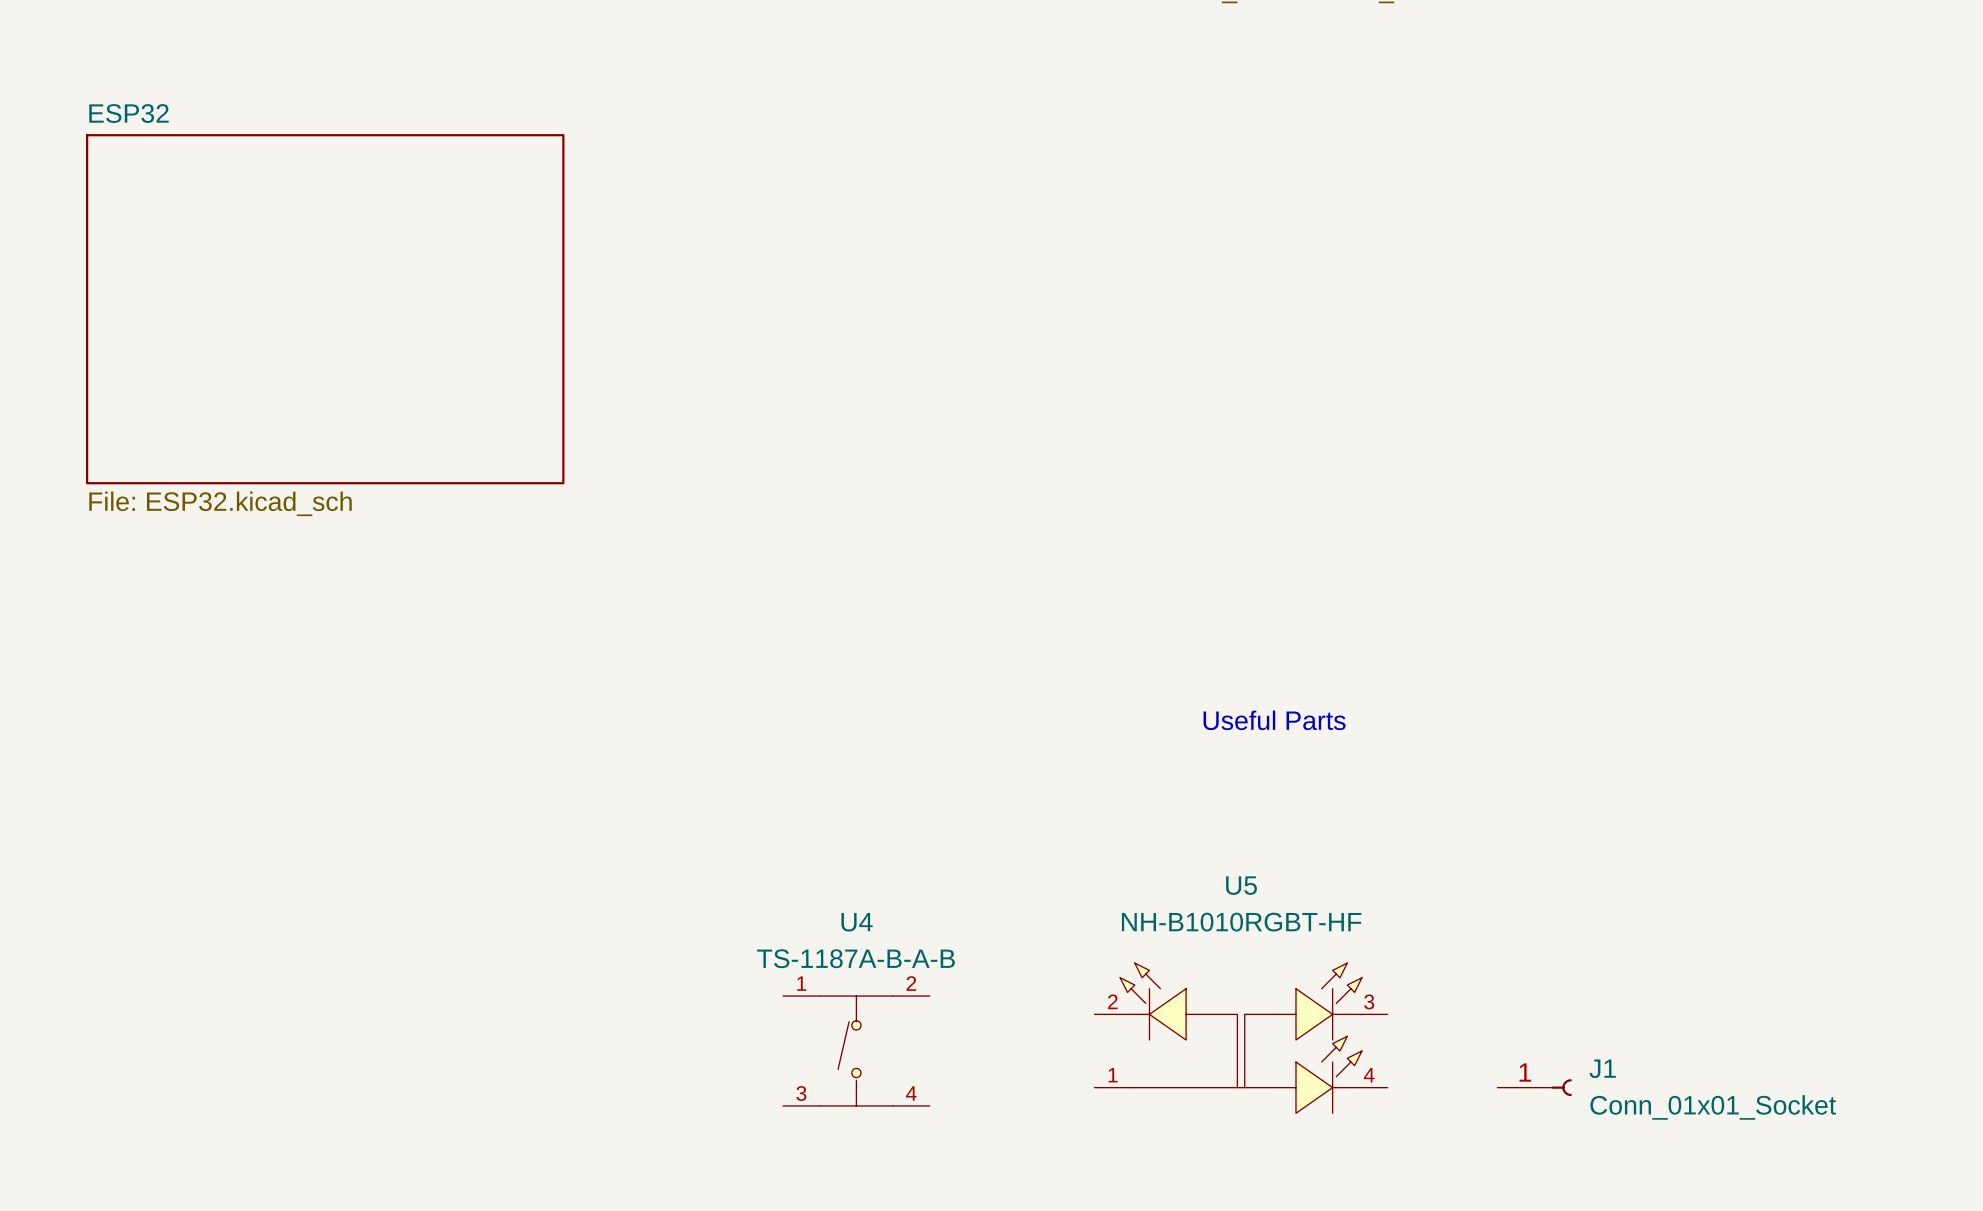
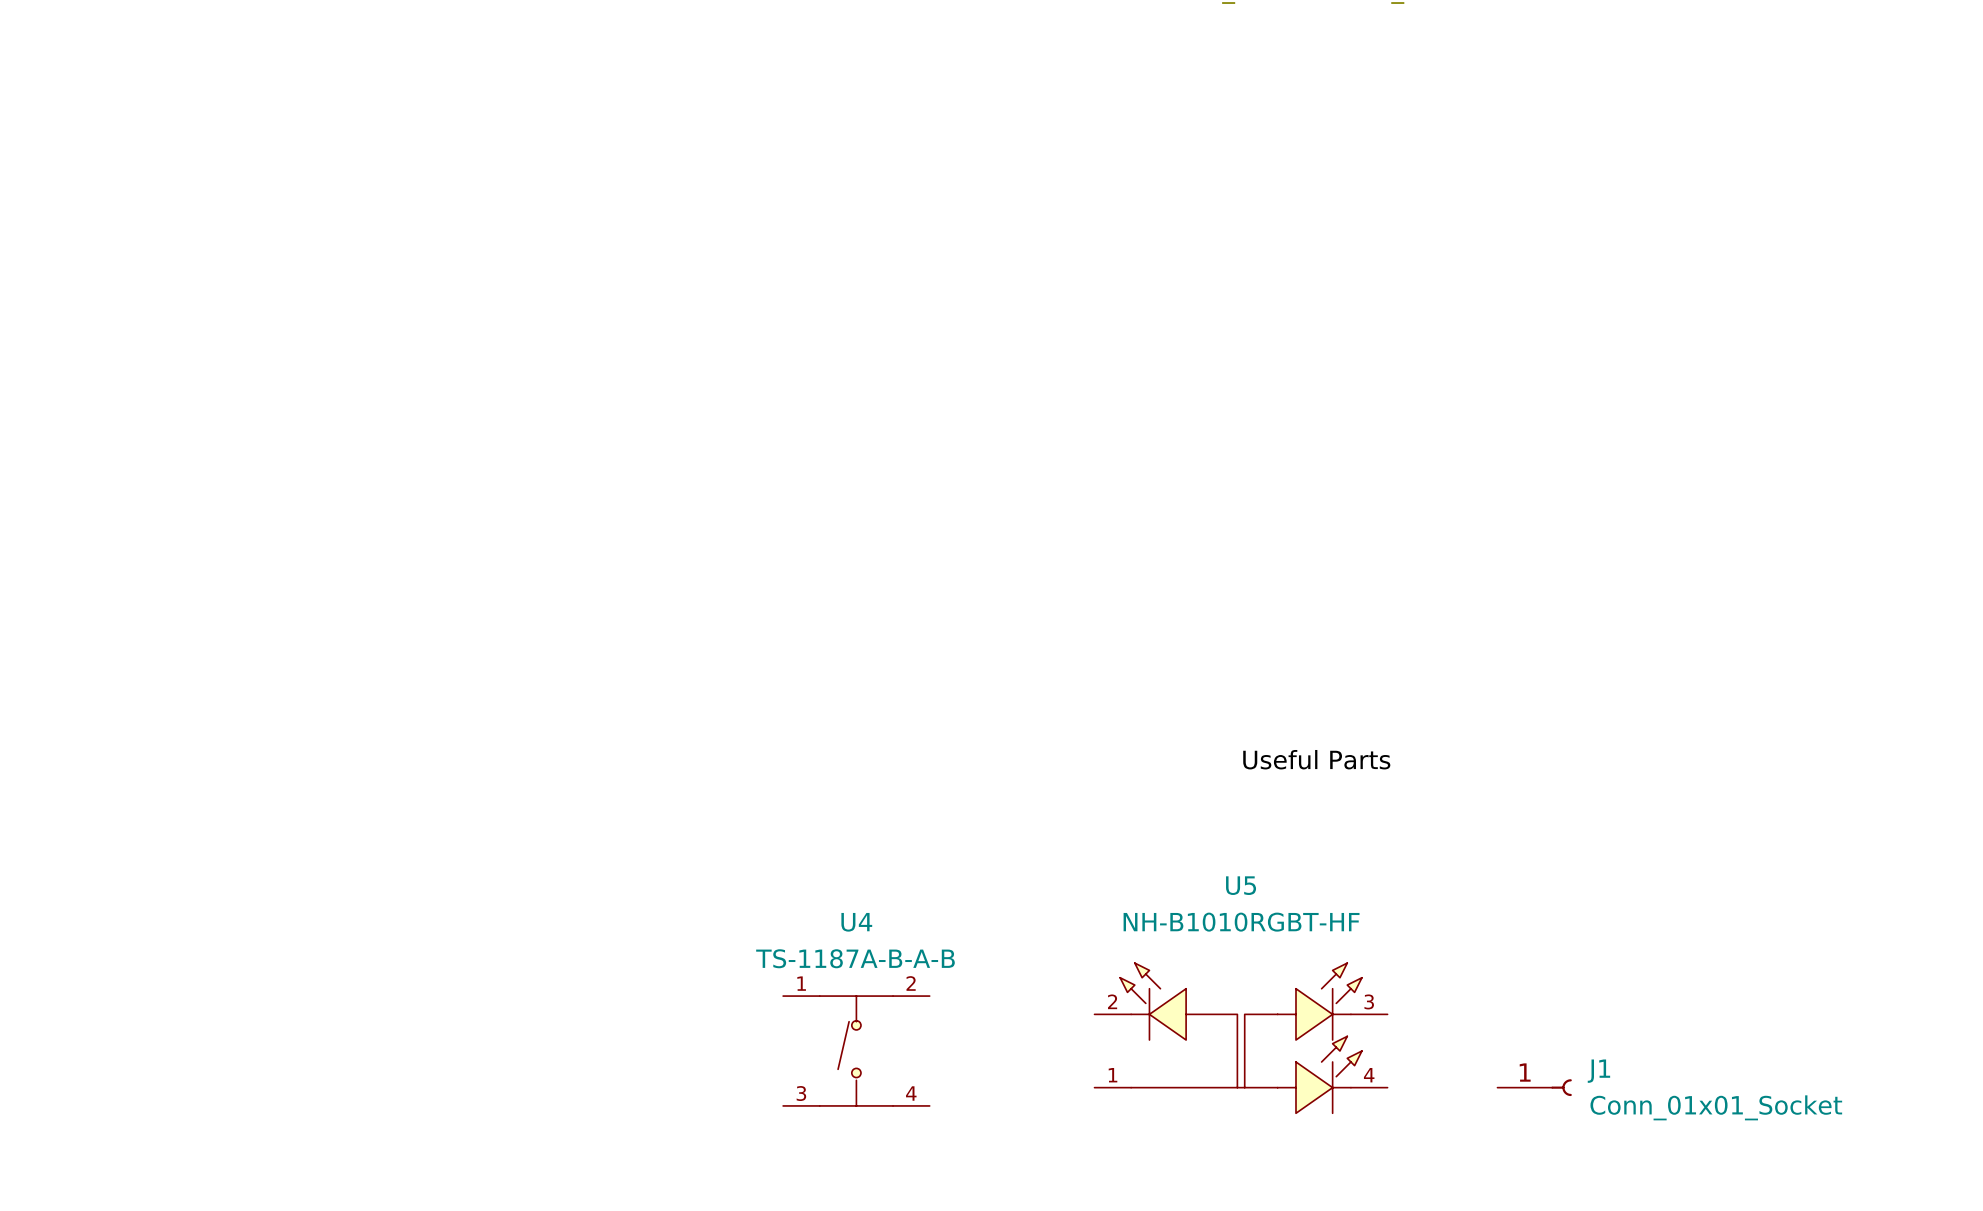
sheet ESP32: File: ESP32.kicad_sch (325, 309) -> none
text: Useful Parts (1274, 720) -> none
label: none -> Useful Parts (1316, 759)

